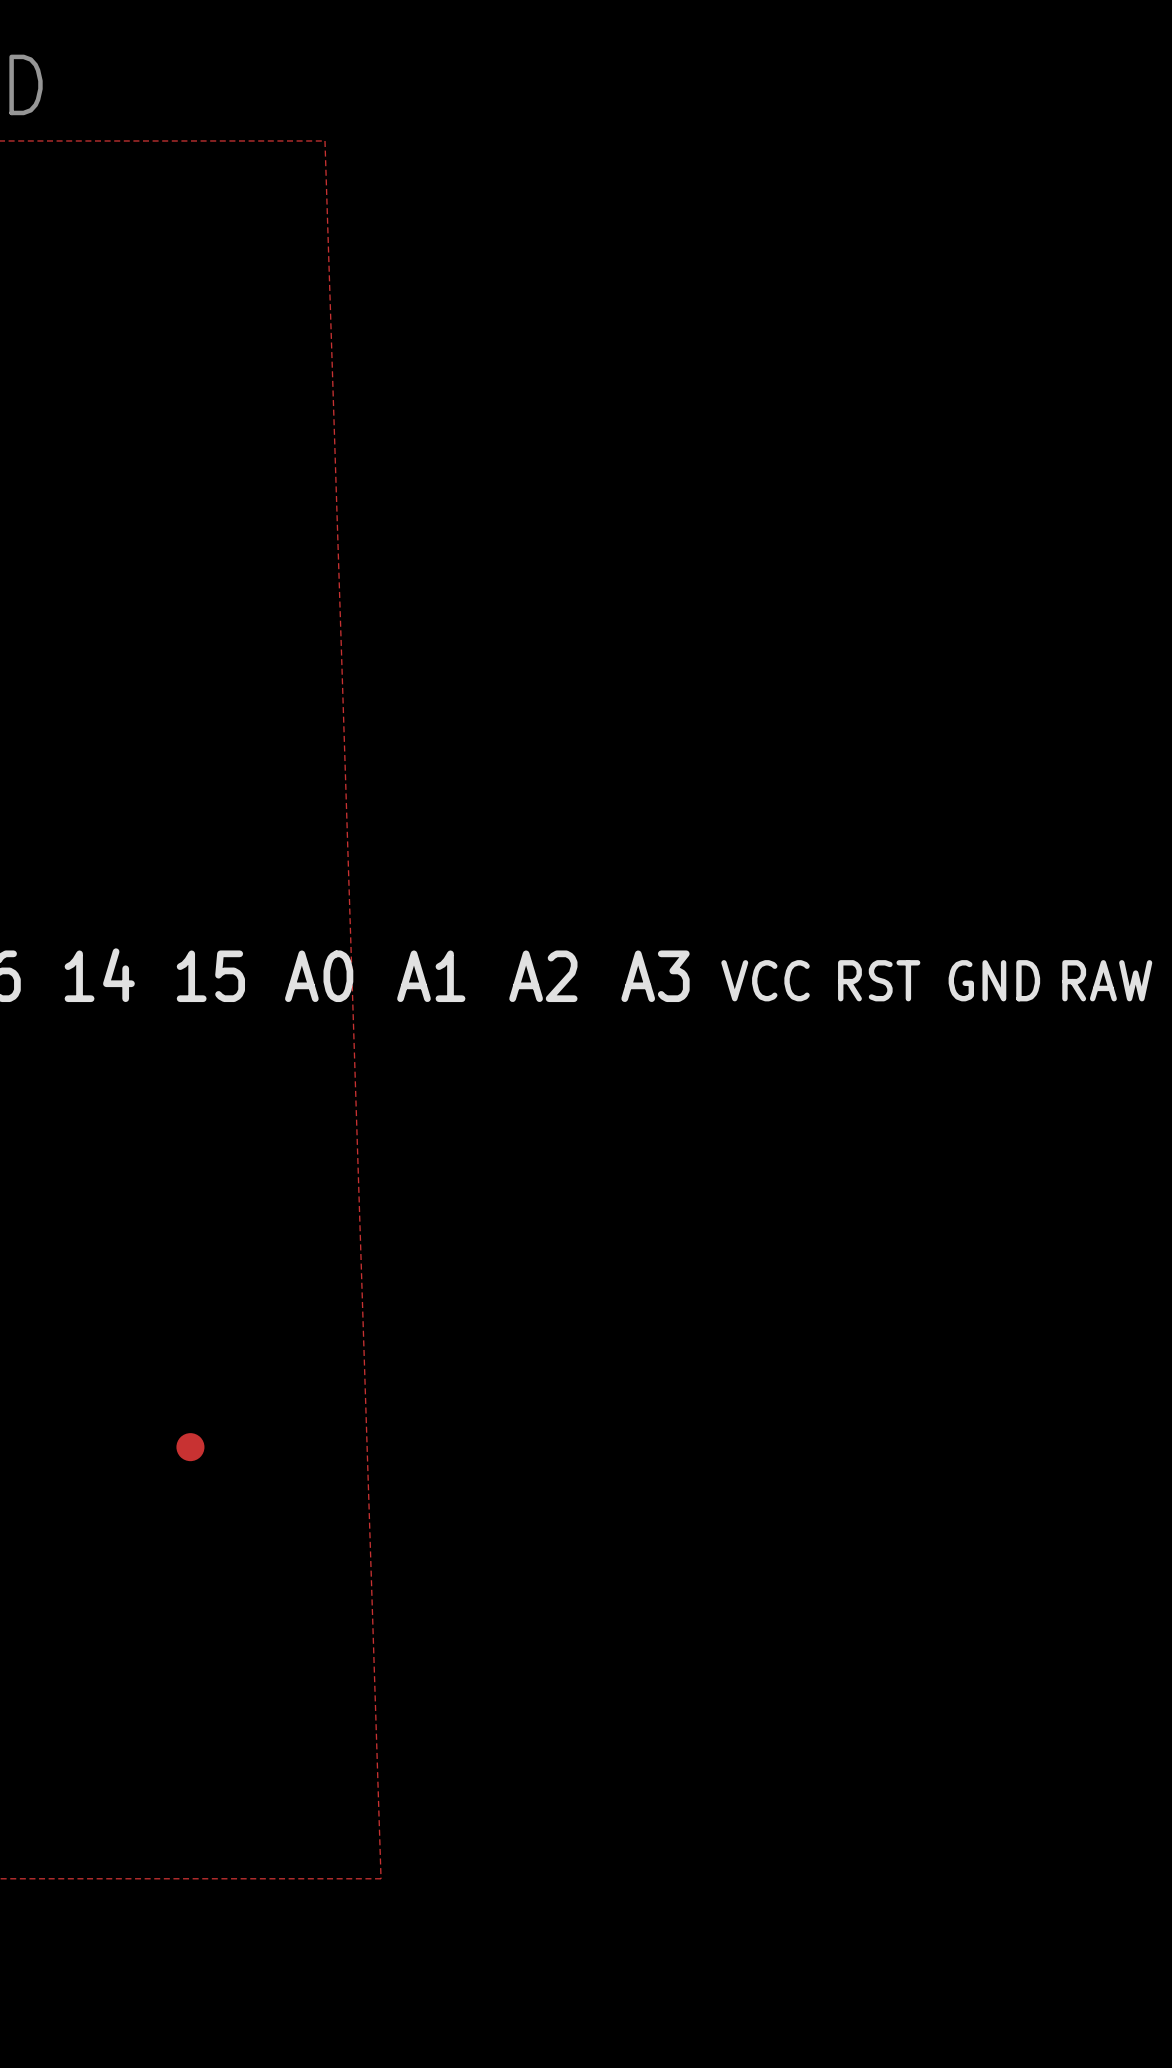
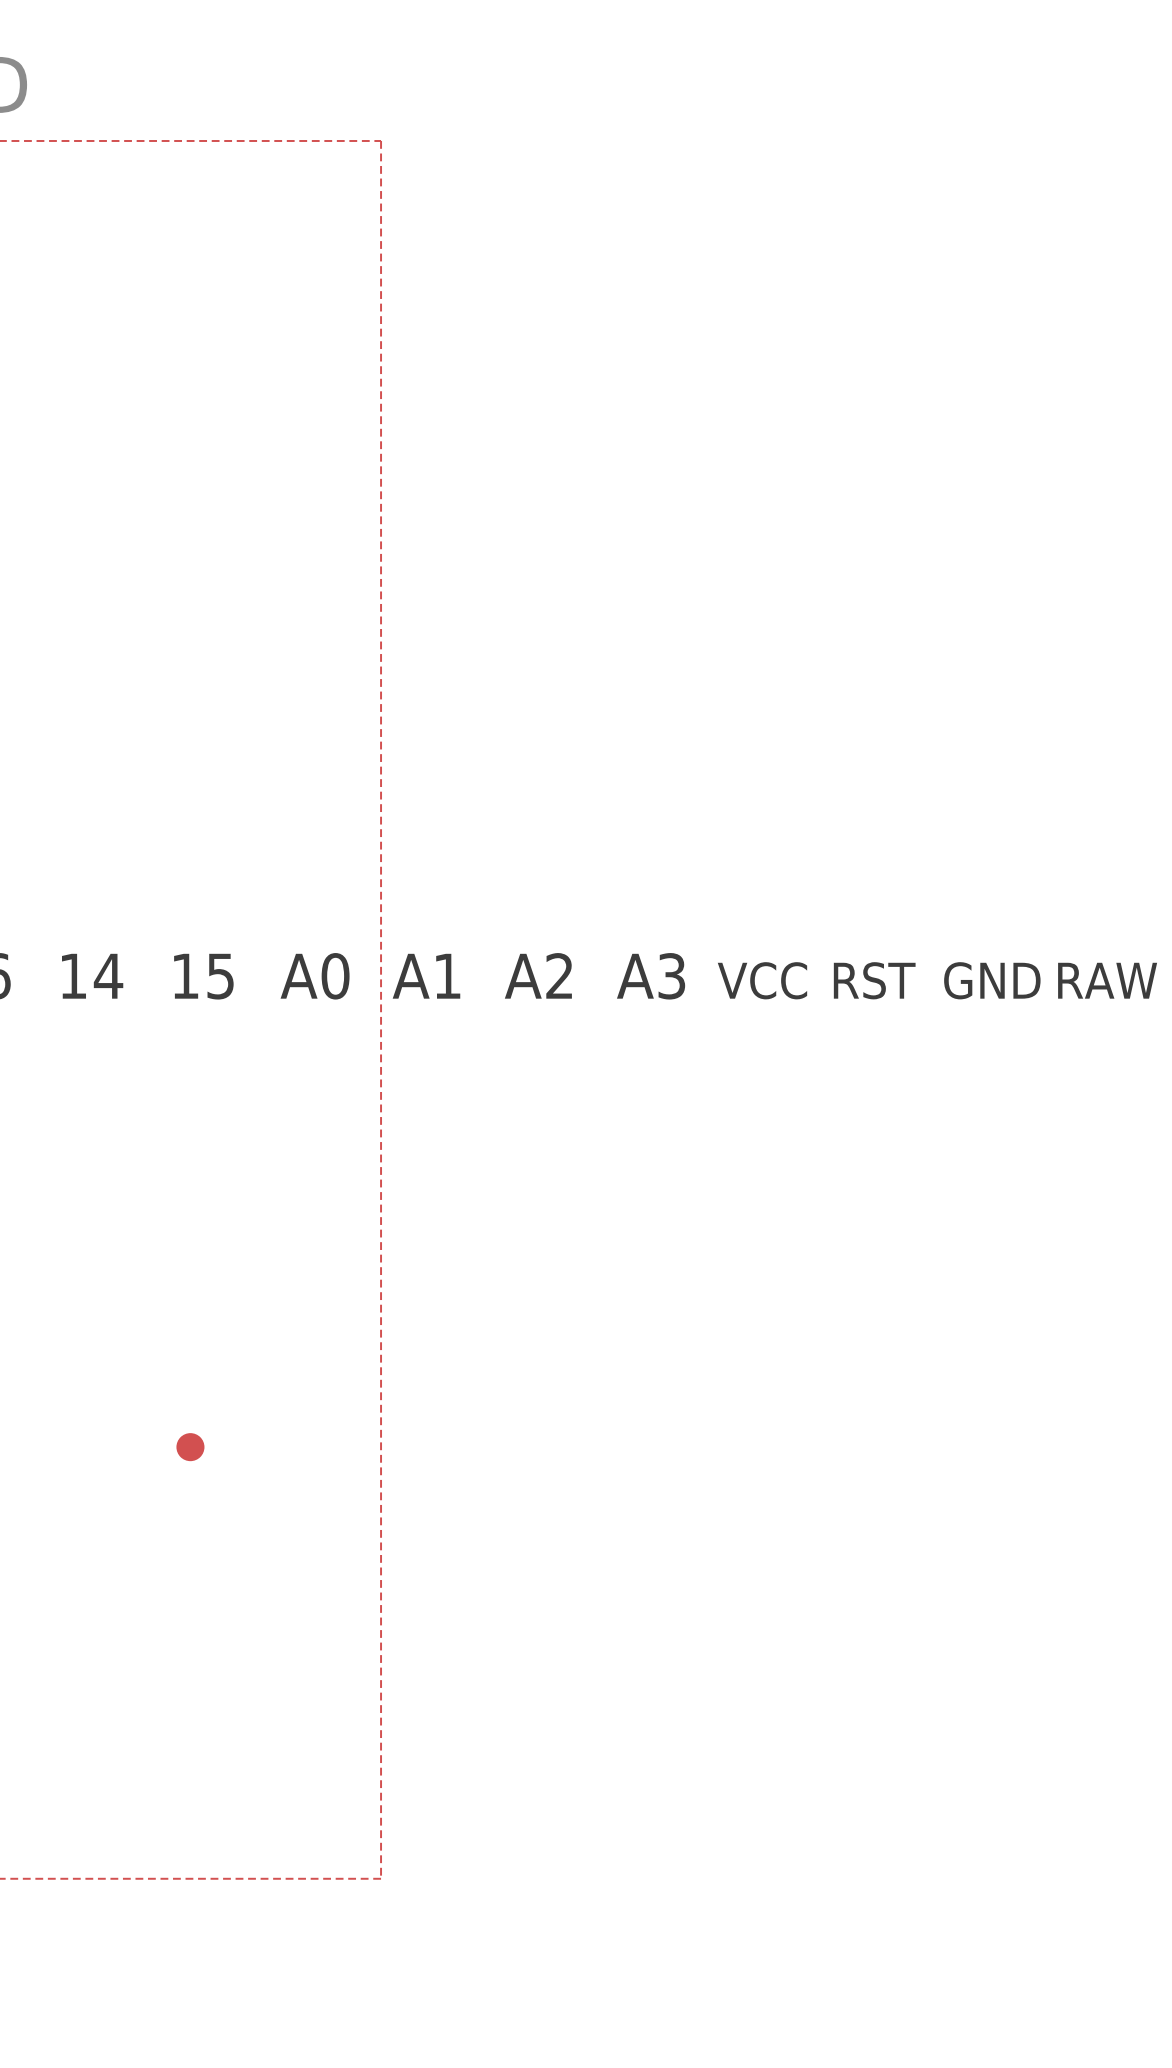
zone outline: (324, 140) (381, 1878) -> (324, 140) (381, 140) (381, 1878)

